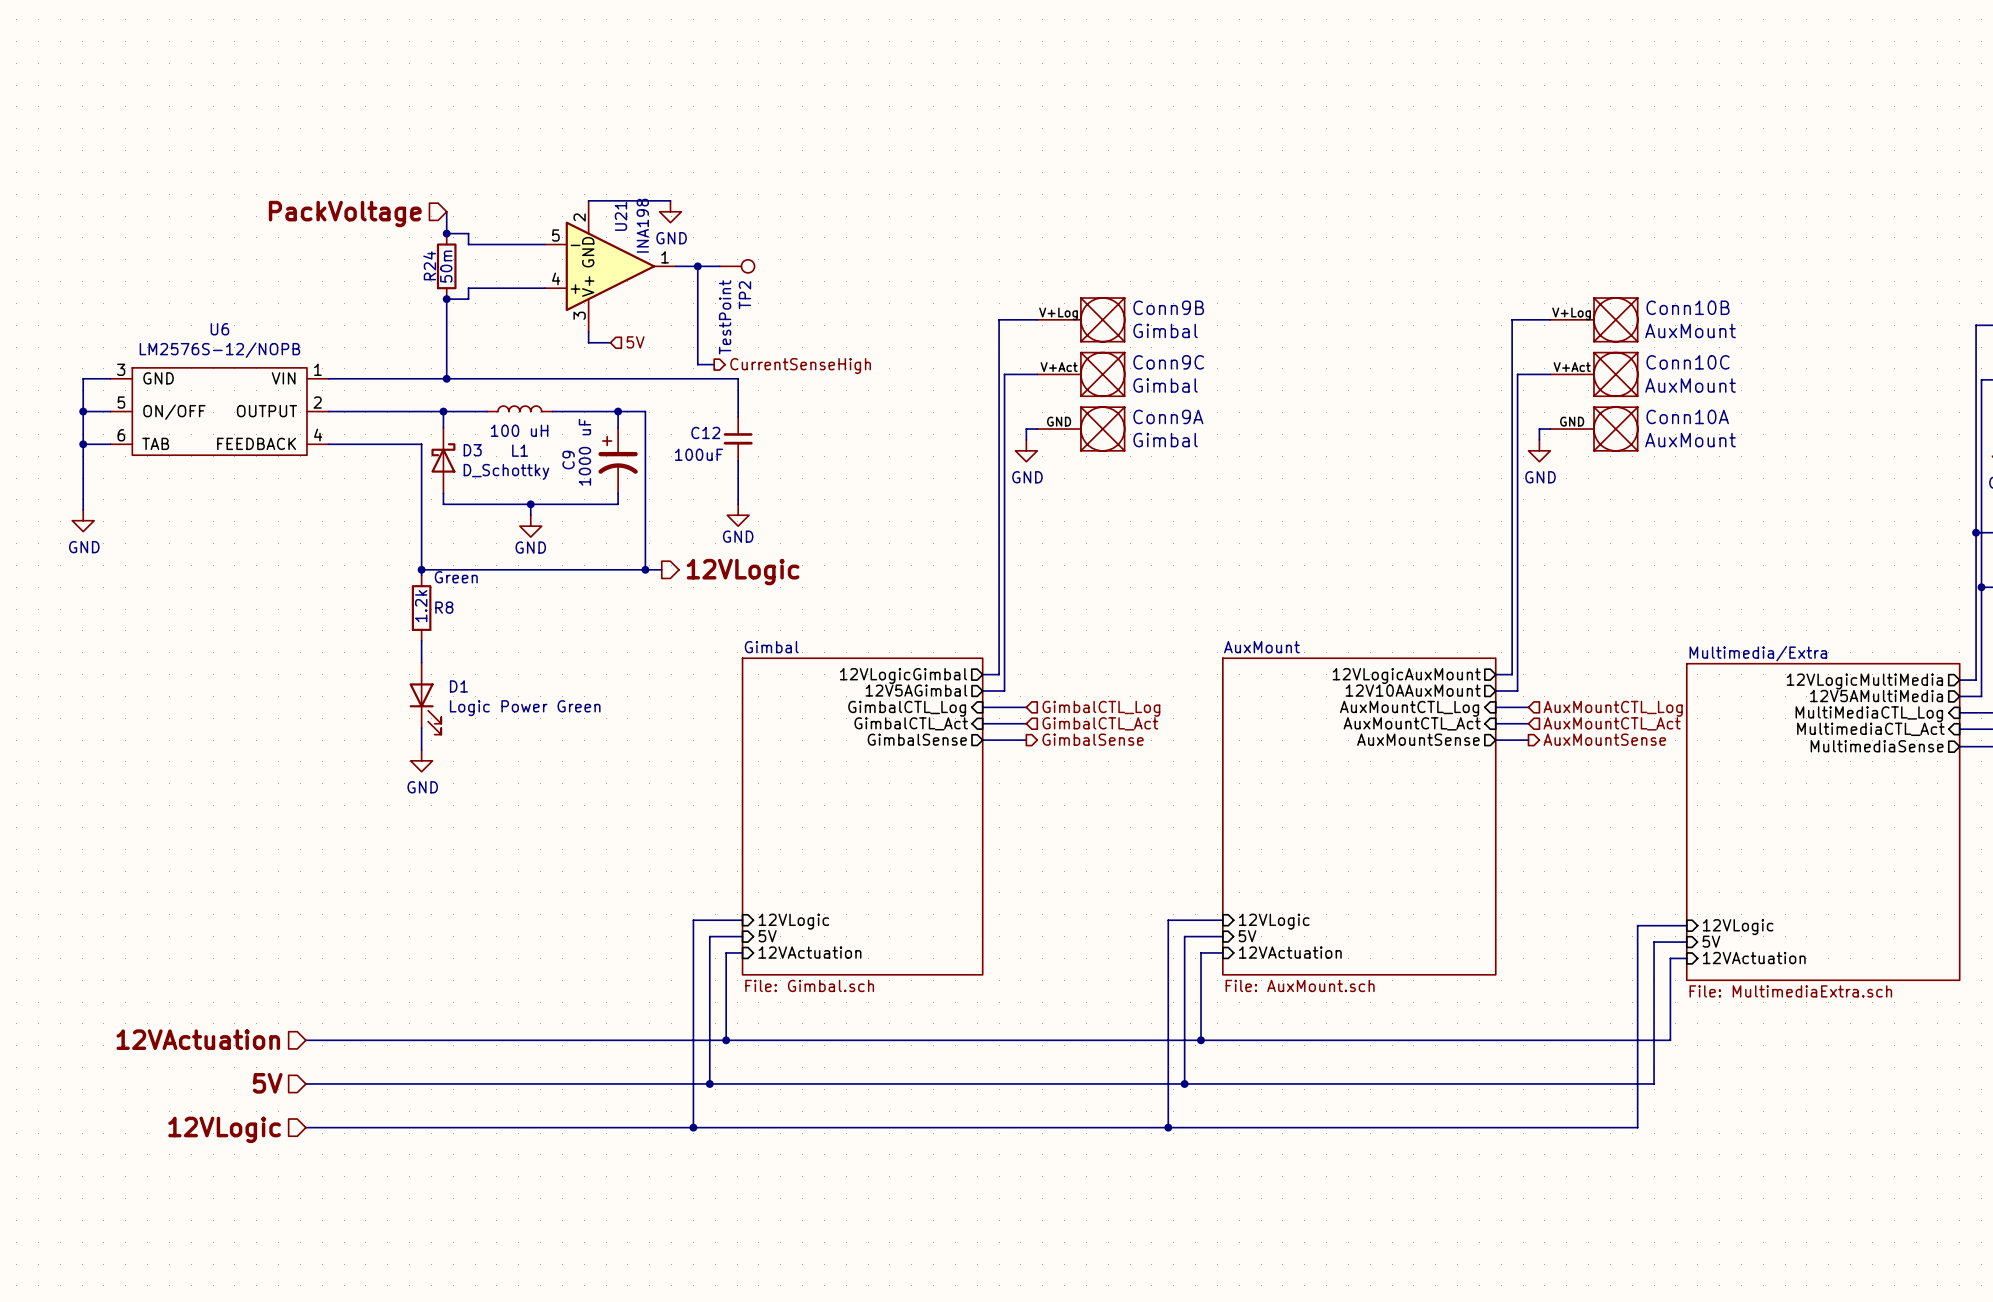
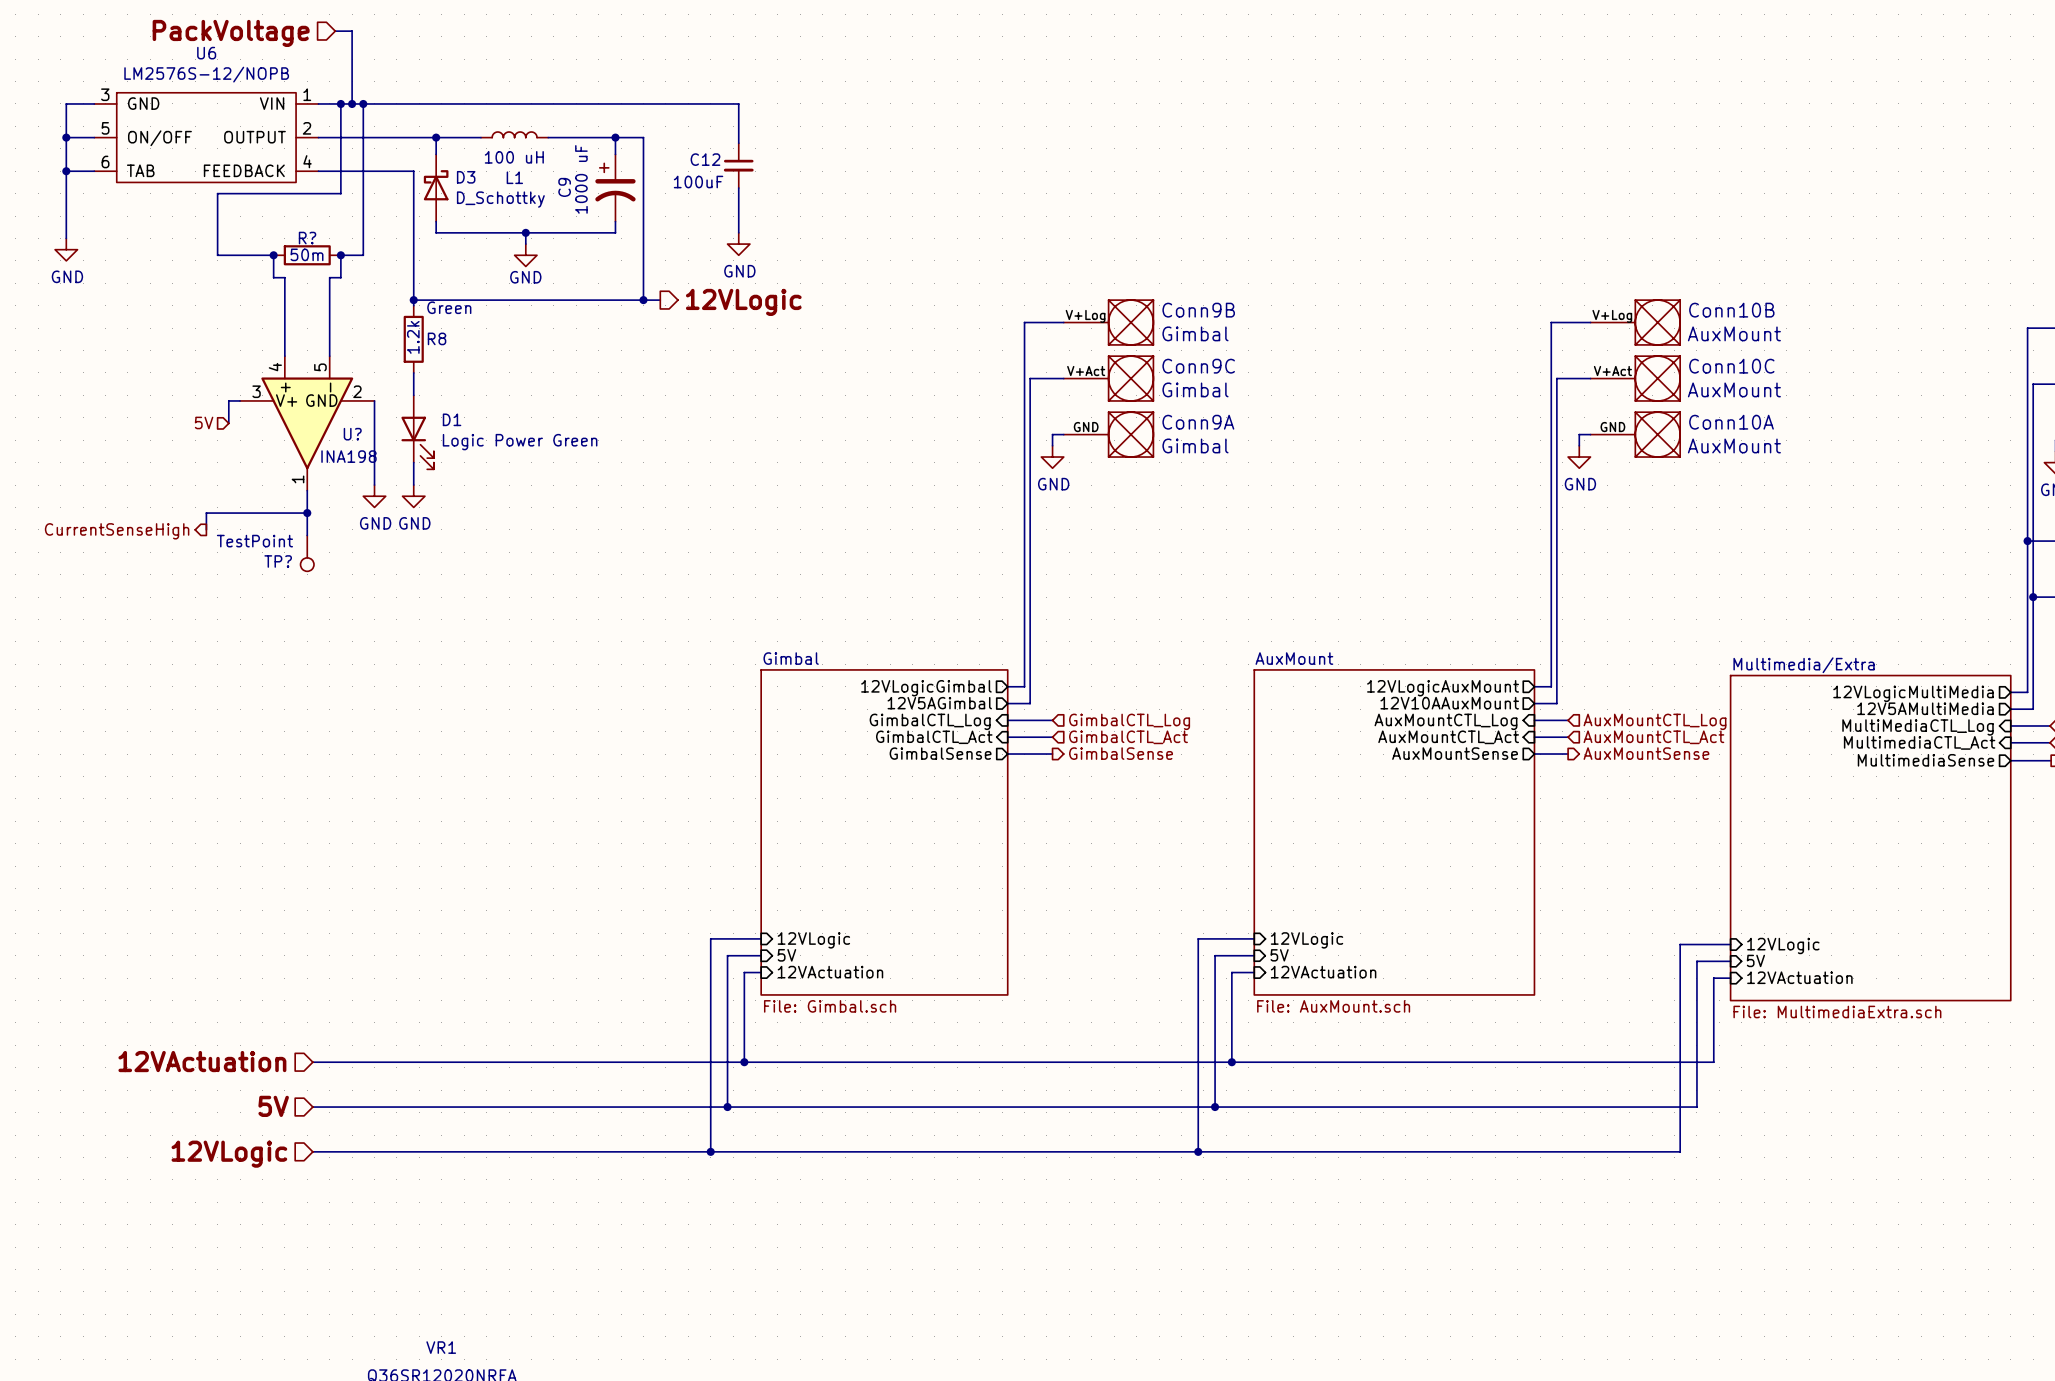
wire: none -> (335, 31) (352, 31) (352, 103)
wire: none -> (94, 103) (66, 103) (66, 238)
wire: none -> (318, 103) (738, 103) (738, 143)
wire: none -> (340, 103) (340, 193) (217, 193) (217, 255) (273, 255) (273, 277) (284, 277) (284, 356)
junction: none -> (340, 103)
junction: none -> (352, 103)
wire: none -> (363, 103) (363, 255) (340, 255) (340, 277) (329, 277) (329, 356)
junction: none -> (363, 103)
wire: none -> (66, 137) (94, 137)
junction: none -> (66, 137)
wire: none -> (318, 137) (480, 137)
wire: none -> (436, 137) (436, 154)
junction: none -> (436, 137)
wire: none -> (548, 137) (643, 137) (643, 300)
wire: none -> (615, 137) (615, 154)
junction: none -> (615, 137)
wire: none -> (66, 171) (94, 171)
junction: none -> (66, 171)
wire: none -> (318, 171) (413, 171) (413, 305)
wire: none -> (738, 188) (738, 232)
wire: (588, 200) (670, 200) -> none
wire: (446, 211) (446, 233) (468, 233) (468, 244) (544, 244) -> none
power symbol position: GND (670, 211) -> GND (738, 244)
hierarchical label position: PackVoltage (345, 214) -> PackVoltage (231, 33)
wire: none -> (436, 221) (436, 232) (615, 232) (615, 221)
wire: none -> (525, 232) (525, 244)
junction: none -> (525, 232)
junction: (446, 233) -> none
power symbol: none -> GND (66, 249)
junction: none -> (273, 255)
R?: none -> 50m (307, 255)
junction: none -> (340, 255)
power symbol: none -> GND (525, 255)
R24: 50m (446, 266) -> none
U21: INA198 (610, 266) -> none
wire: (675, 266) (719, 266) -> none
wire: (697, 266) (697, 364) (714, 364) -> none
junction: (697, 266) -> none
TP2: TestPoint (737, 266) -> none
wire: (544, 288) (468, 288) (468, 299) (446, 299) (446, 378) -> none
wire: none -> (413, 300) (660, 300)
junction: none -> (413, 300)
junction: none -> (643, 300)
junction: (446, 299) -> none
hierarchical label: none -> 12VLogic (743, 302)
text: none -> Green (449, 307)
wire: (588, 331) (588, 342) (610, 342) -> none
hierarchical label: 5V (635, 342) -> none
hierarchical label: CurrentSenseHigh (800, 366) -> none
wire: none -> (413, 372) (413, 395)
wire: (110, 378) (83, 378) (83, 509) -> none
wire: (328, 378) (738, 378) (738, 417) -> none
junction: (446, 378) -> none
wire: none -> (240, 400) (228, 400) (228, 423)
wire: none -> (374, 400) (374, 485)
L1 position: (519, 408) -> (514, 134)
wire: (83, 411) (110, 411) -> none
junction: (83, 411) -> none
U6 position: (219, 411) -> (206, 137)
wire: (328, 411) (487, 411) -> none
wire: (443, 411) (443, 427) -> none
junction: (443, 411) -> none
wire: (552, 411) (645, 411) (645, 569) -> none
wire: (618, 411) (618, 427) -> none
junction: (618, 411) -> none
hierarchical label: none -> 5V (204, 422)
U?: none -> INA198 (307, 423)
C12 position: (738, 438) -> (738, 165)
wire: (83, 444) (110, 444) -> none
junction: (83, 444) -> none
wire: (328, 444) (421, 444) (421, 575) -> none
D3 position: (443, 460) -> (436, 188)
C9 position: (618, 460) -> (615, 188)
wire: (738, 460) (738, 504) -> none
wire: none -> (307, 490) (307, 535)
power symbol: none -> GND (374, 496)
power symbol: none -> GND (413, 496)
wire: (443, 493) (443, 504) (618, 504) (618, 493) -> none
wire: (530, 504) (530, 515) -> none
junction: (530, 504) -> none
wire: none -> (307, 513) (206, 513) (206, 529)
junction: none -> (307, 513)
power symbol: GND (738, 515) -> none
power symbol: GND (83, 520) -> none
hierarchical label: none -> CurrentSenseHigh (117, 531)
power symbol: GND (530, 526) -> none
TP?: none -> TestPoint (307, 553)
wire: (421, 569) (661, 569) -> none
junction: (421, 569) -> none
junction: (645, 569) -> none
hierarchical label: 12VLogic (743, 572) -> none
text: Green (456, 577) -> none
R8 position: (421, 608) -> (413, 339)
wire: (421, 640) (421, 662) -> (413, 462) (413, 485)
D1 position: (425, 698) -> (417, 432)
wire: (421, 728) (421, 749) -> none
power symbol: GND (421, 760) -> none

